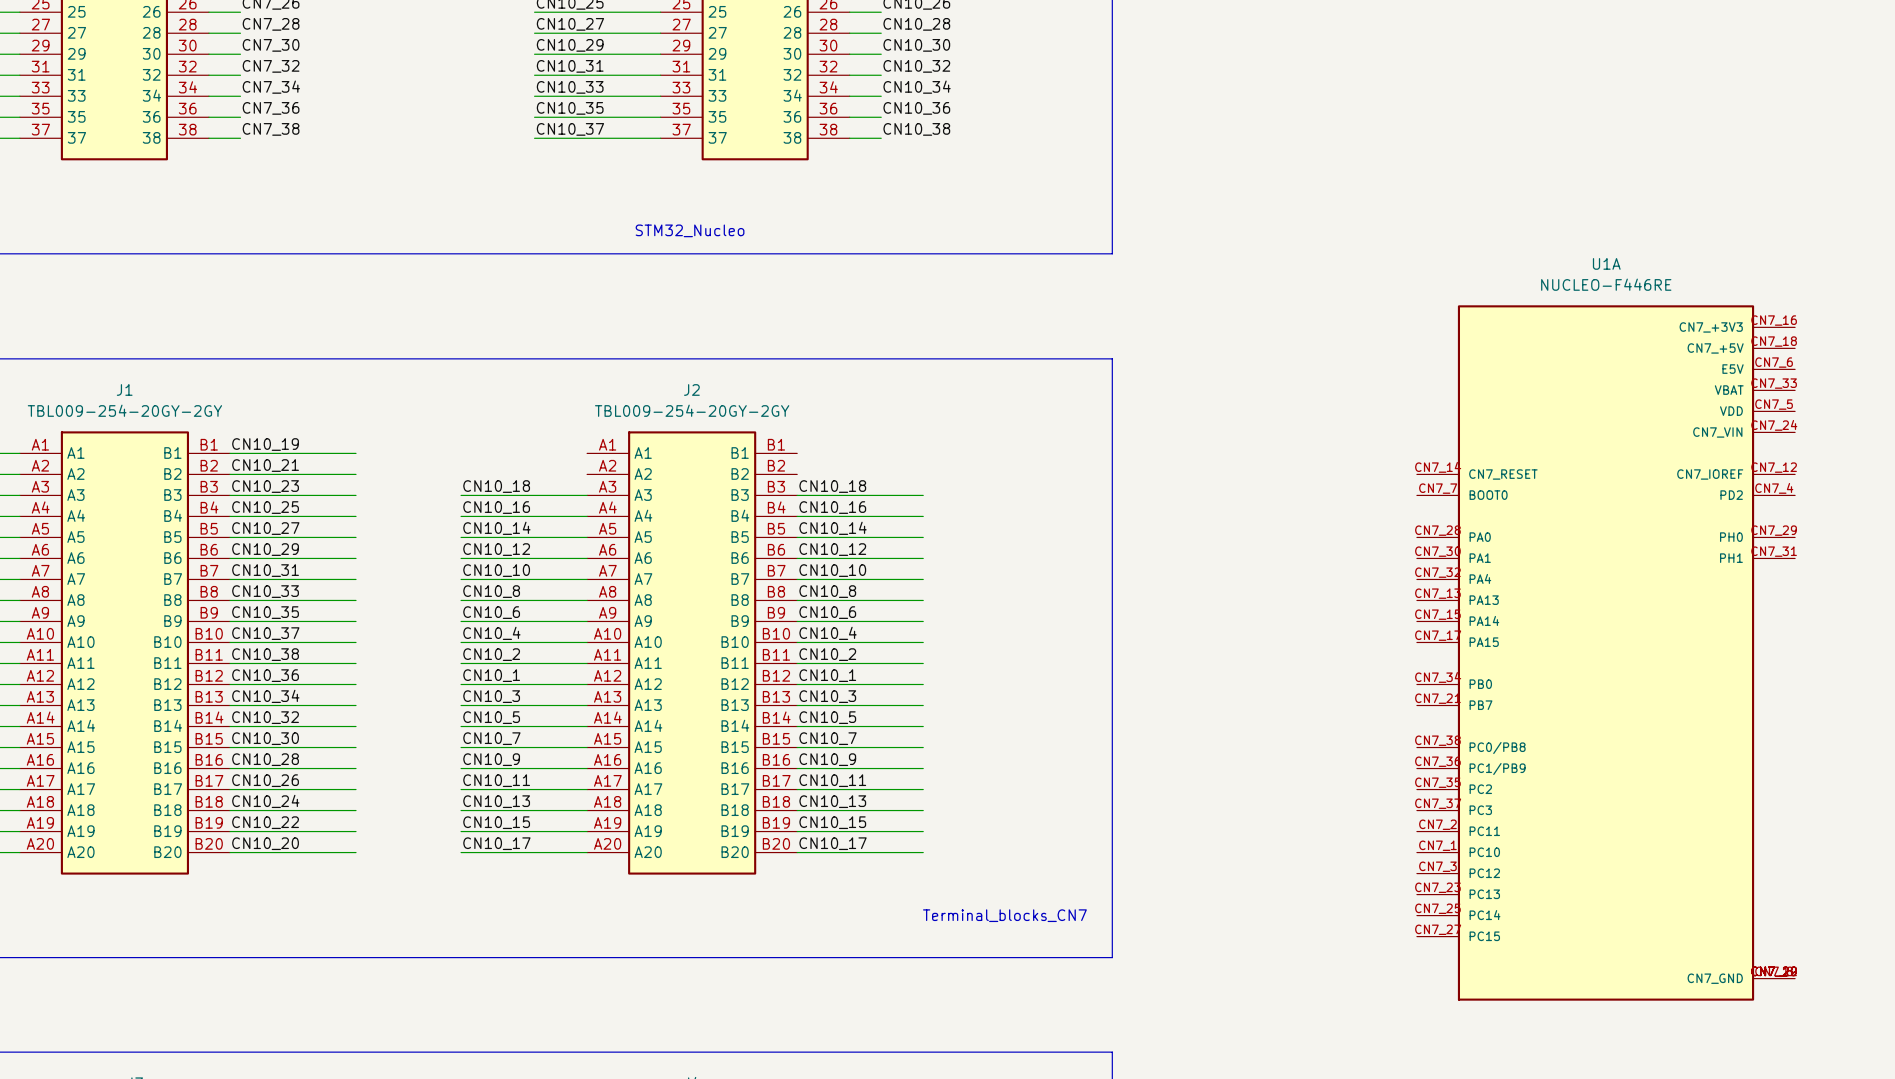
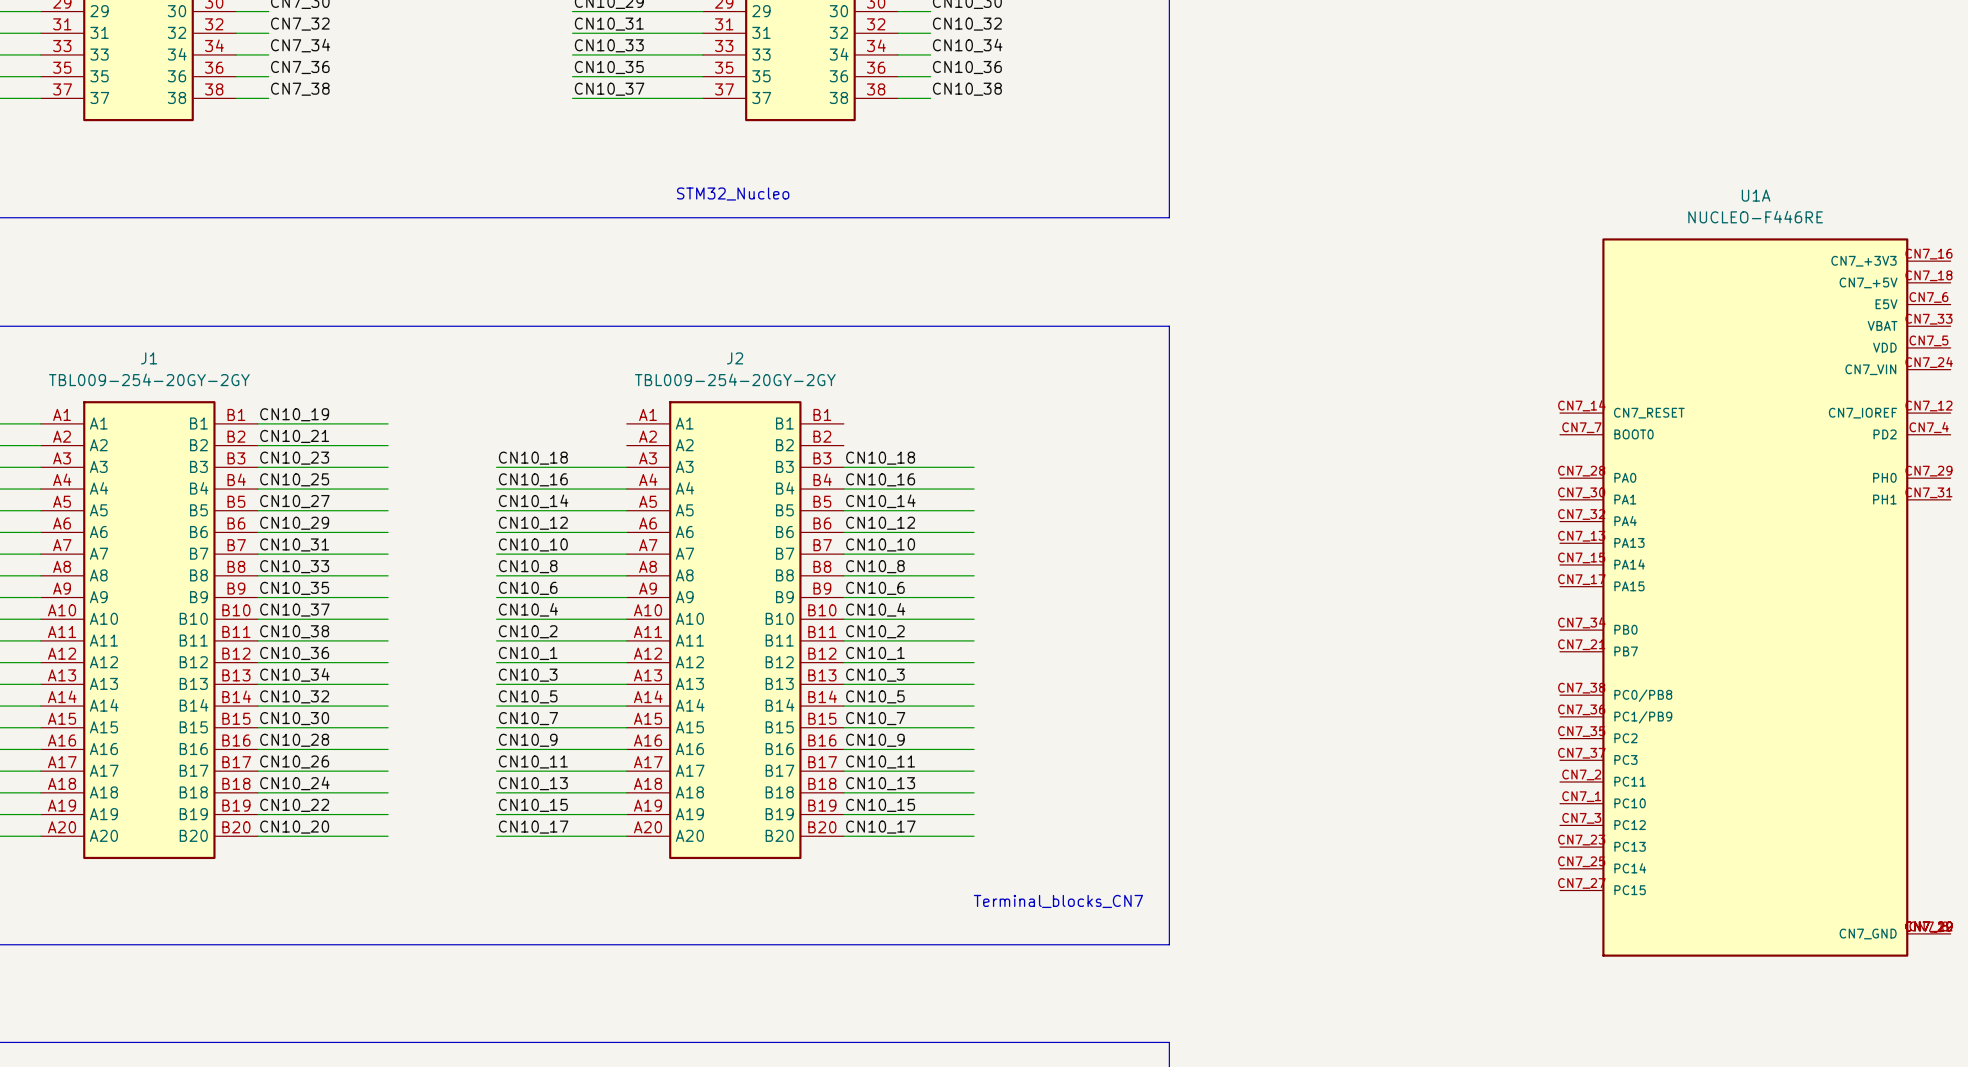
U1A position: (1606, 652) -> (1755, 597)

